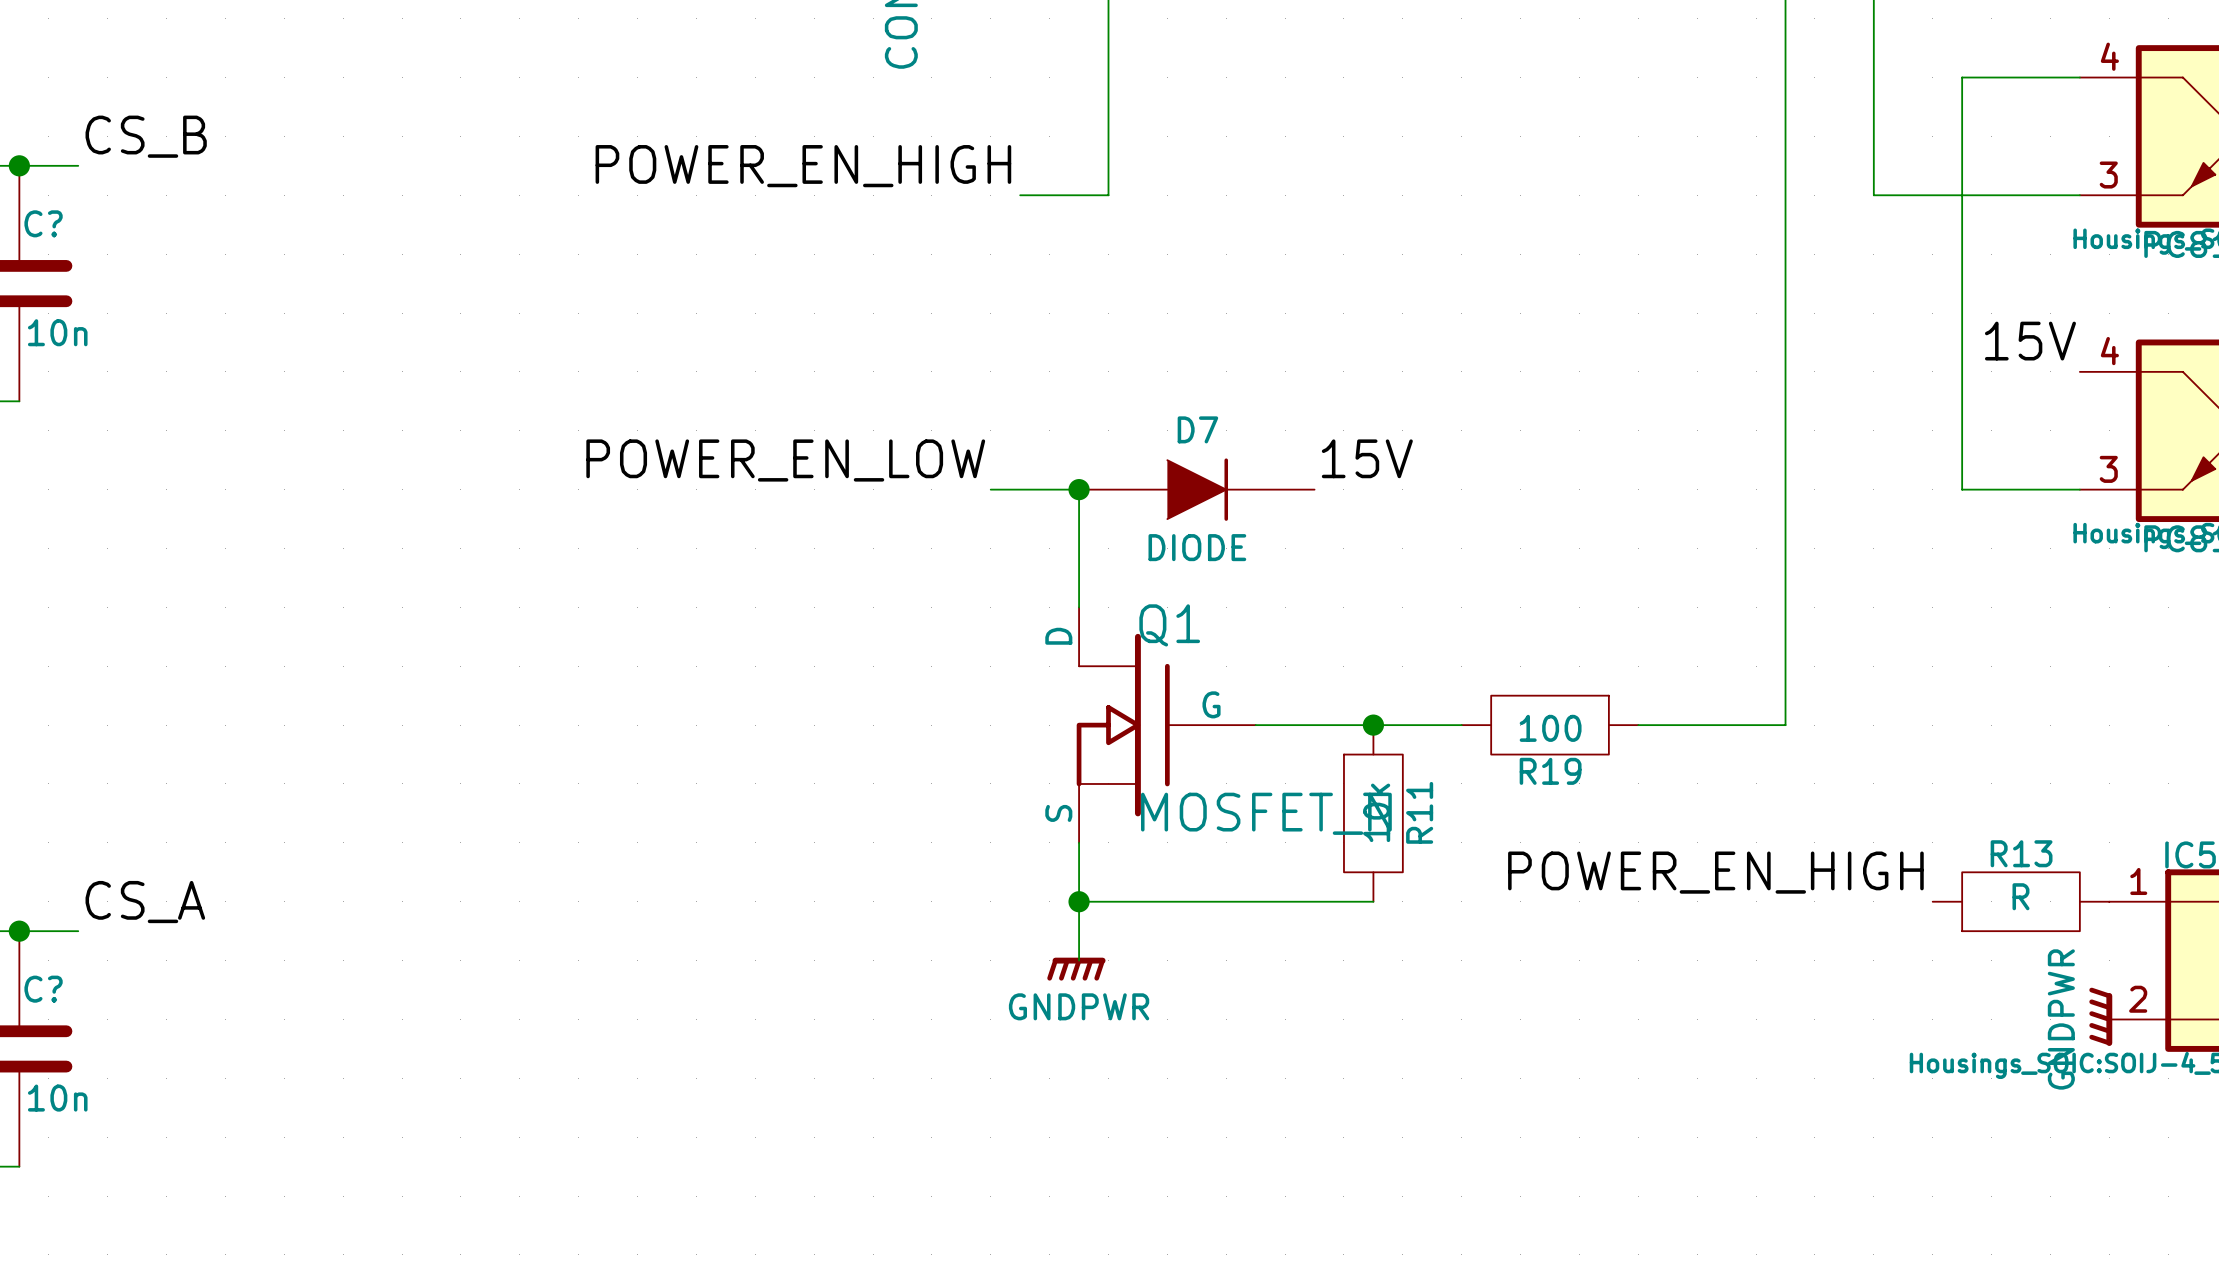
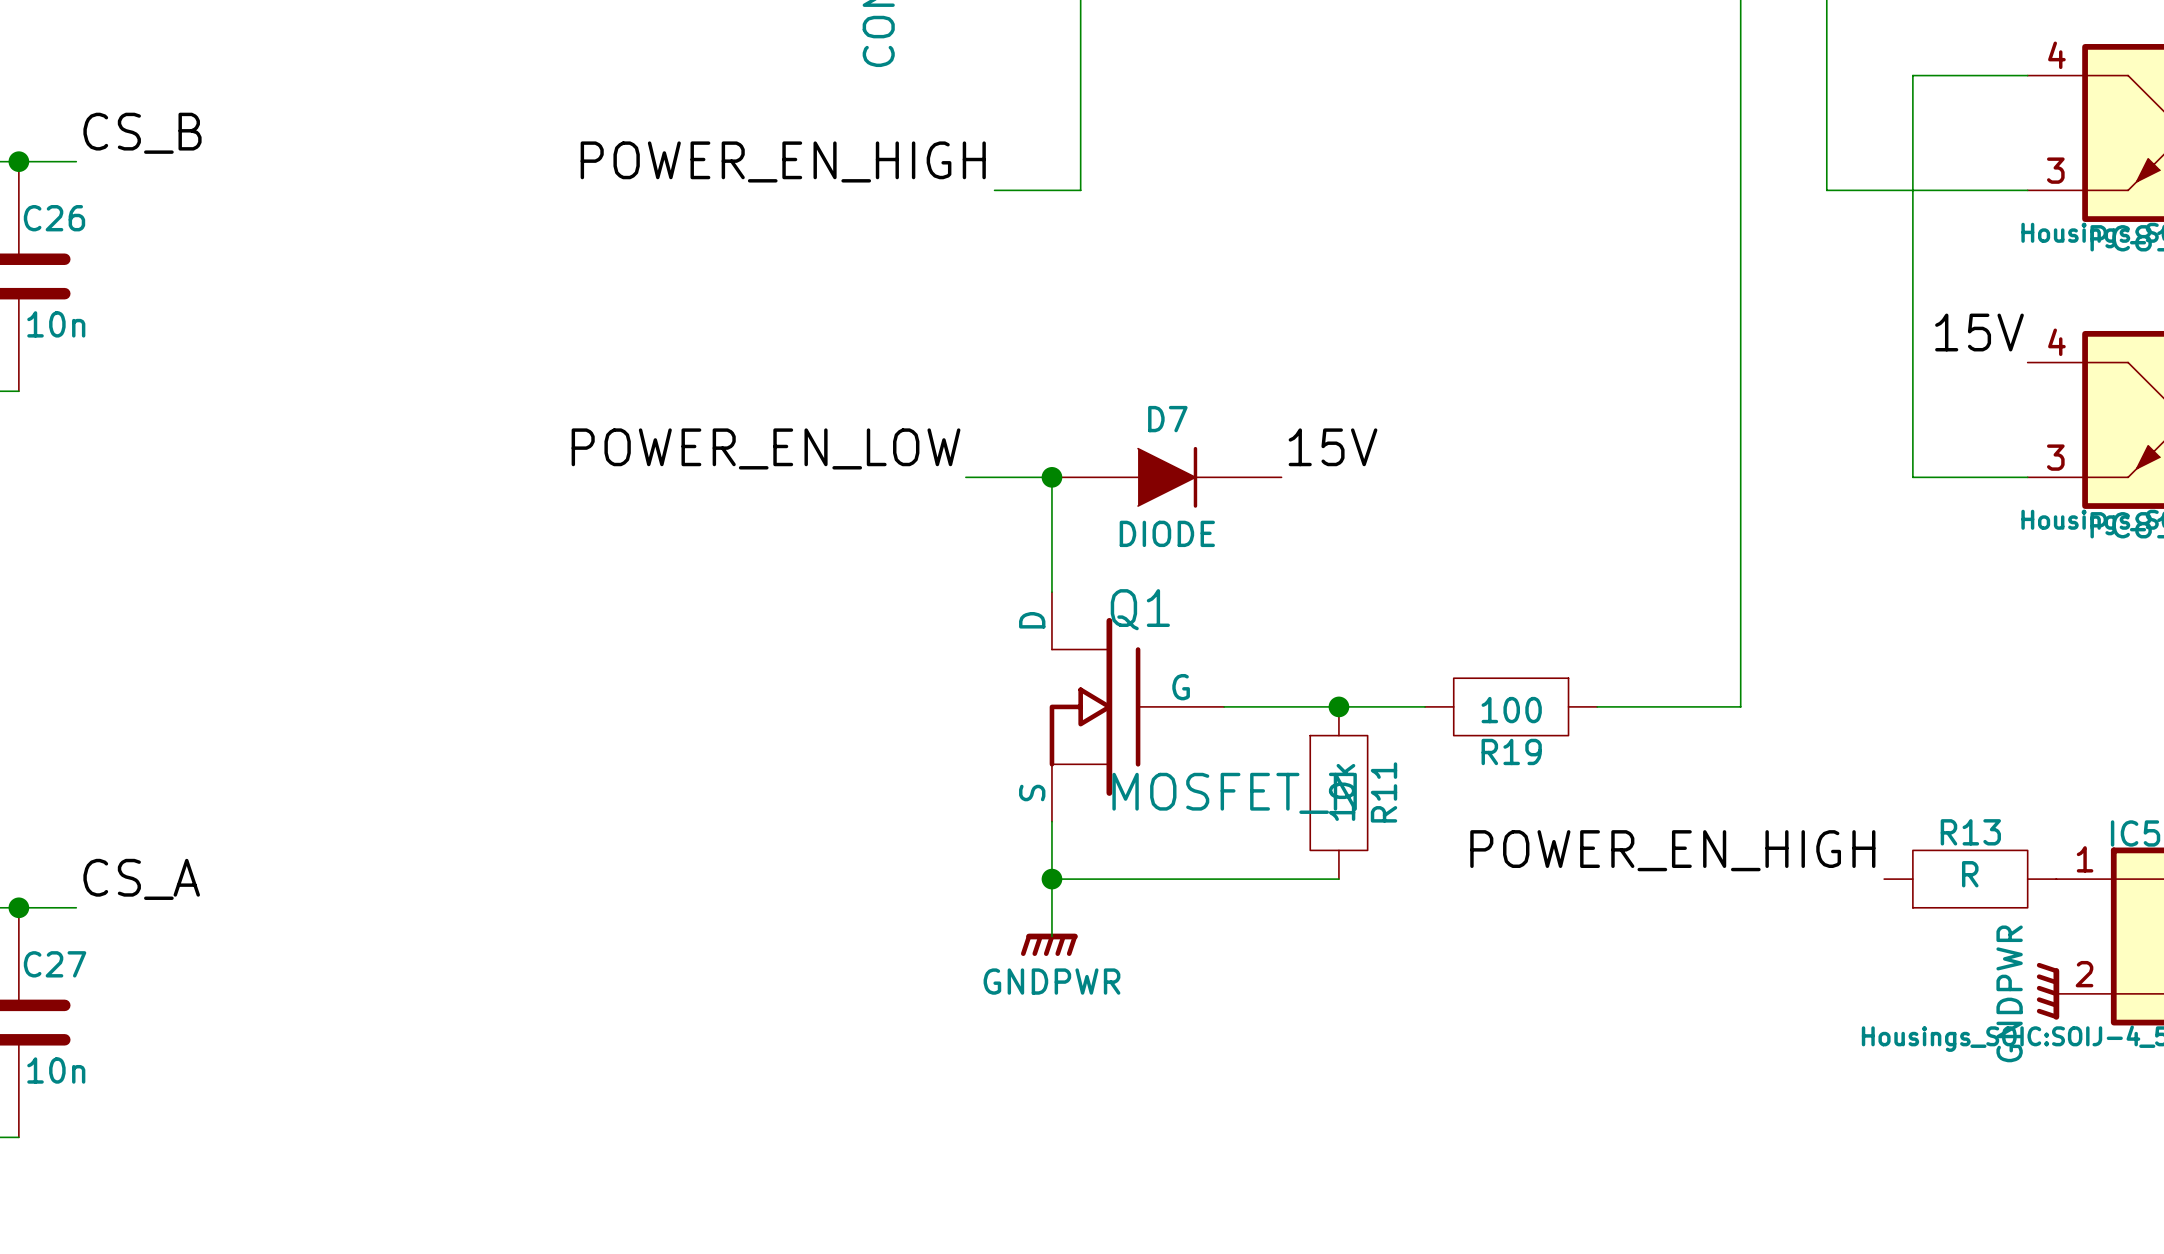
C? name: C? (43, 223) -> C26 (54, 218)
C? name: C? (43, 989) -> C27 (55, 964)

